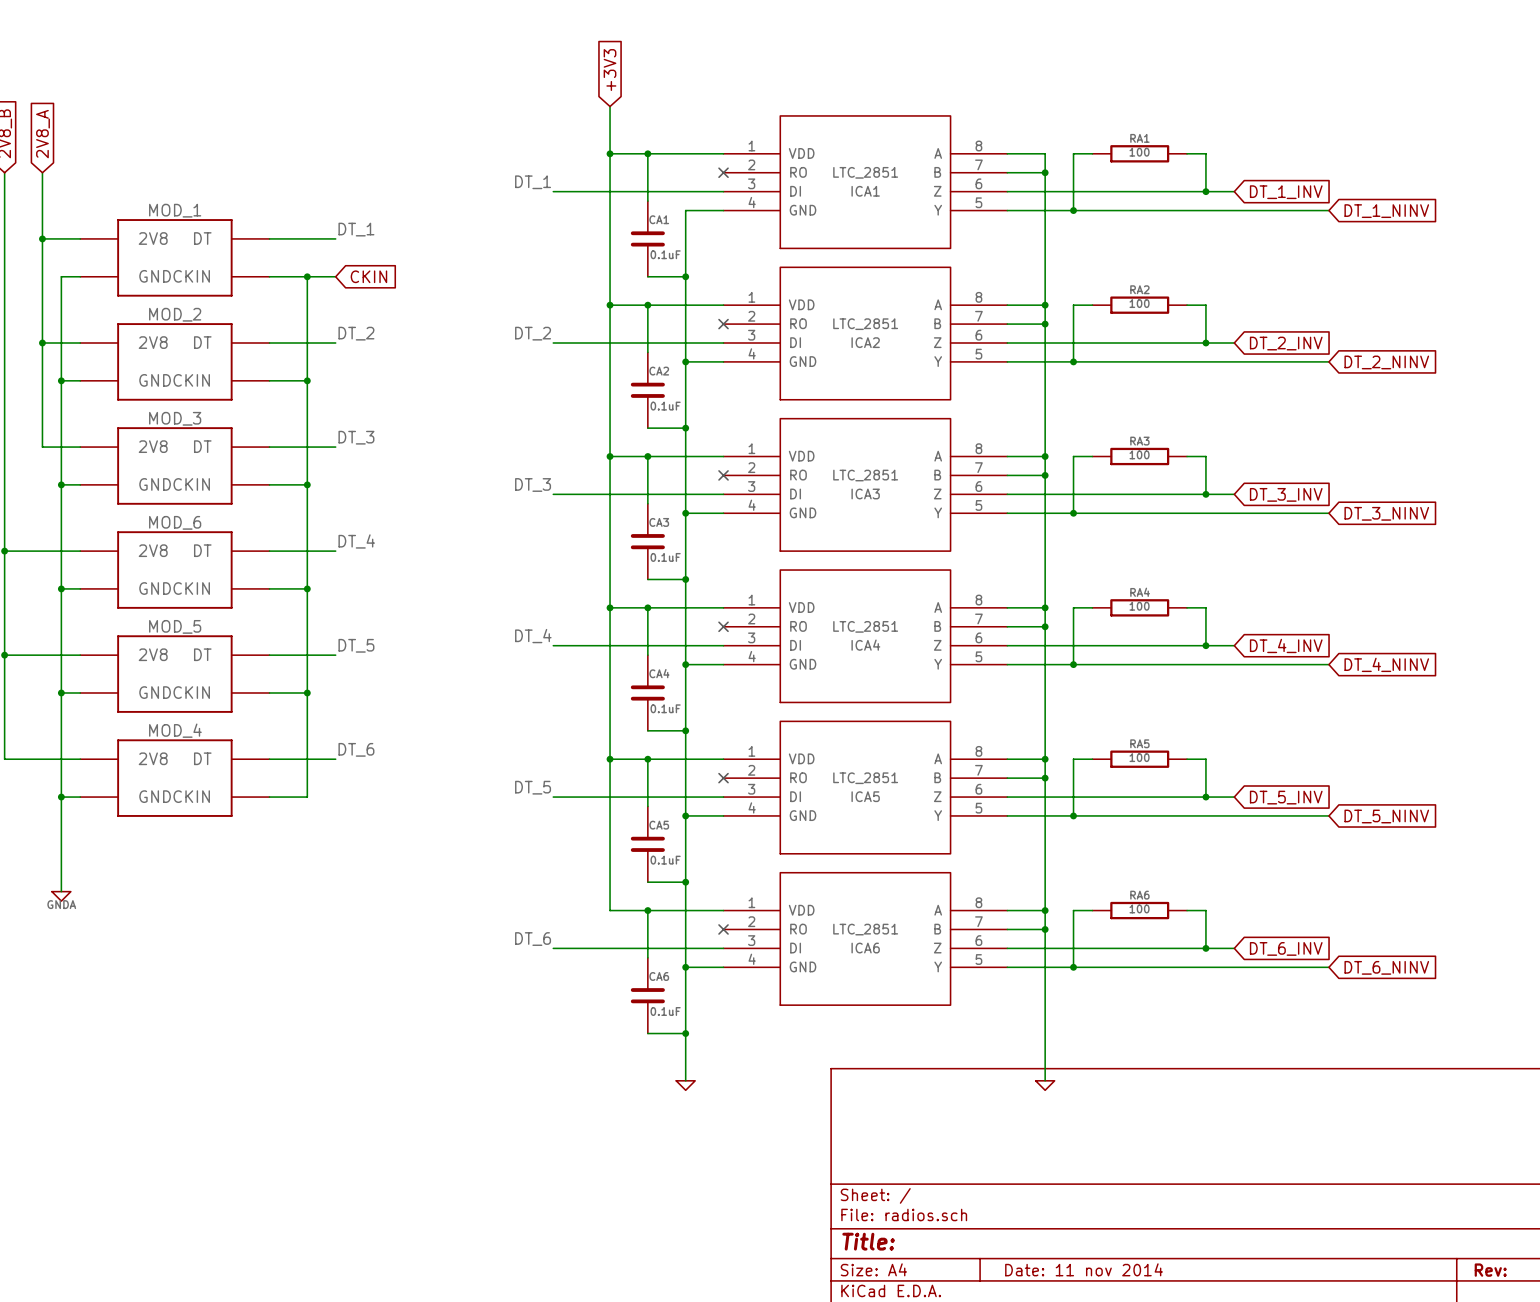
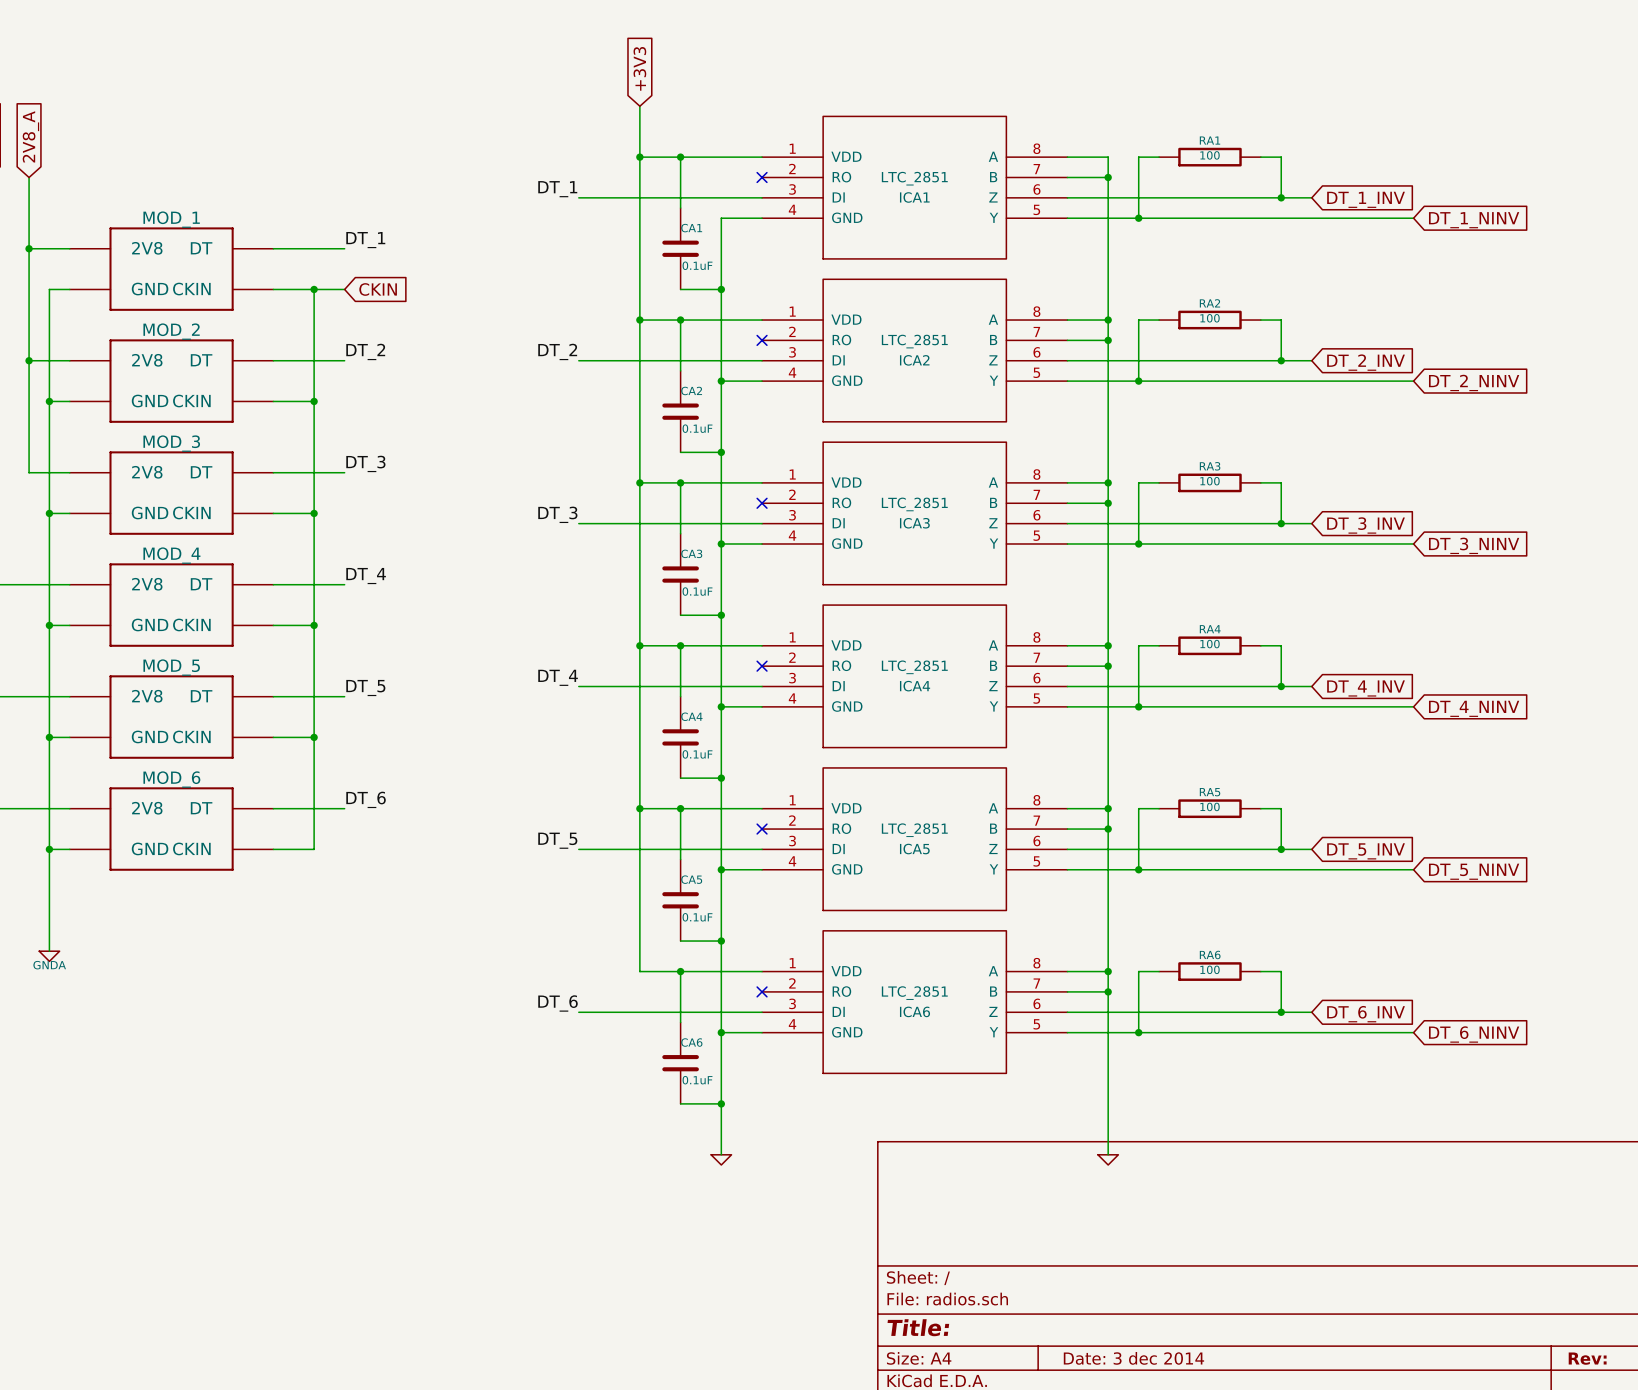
MOD_6 name: MOD_6 (175, 522) -> MOD_4 (171, 555)
MOD_4 name: MOD_4 (175, 730) -> MOD_6 (171, 779)
title block: Date: 11 nov 2014 (1084, 1269) -> Date: 3 dec 2014 (1133, 1358)

